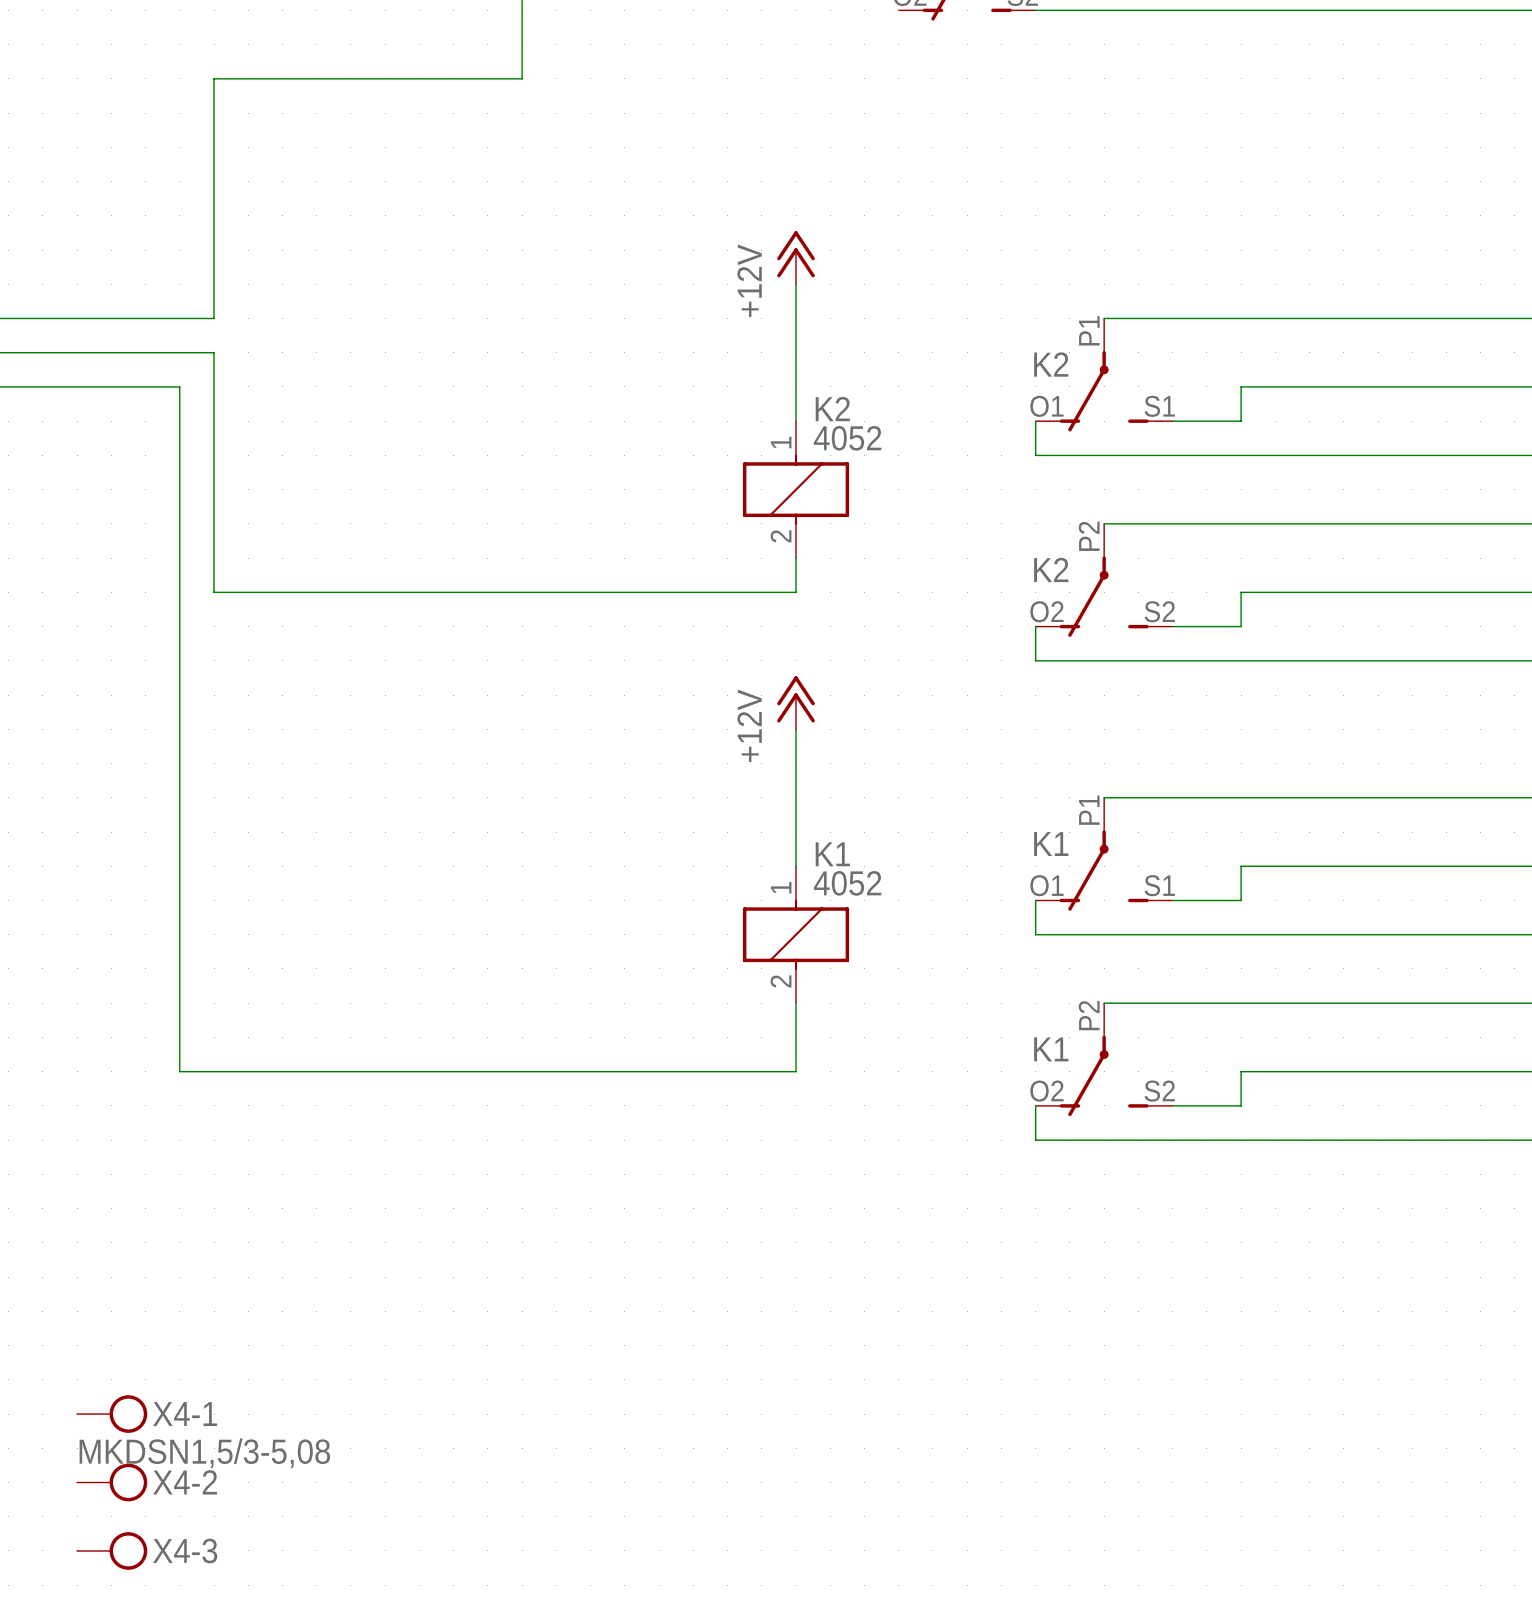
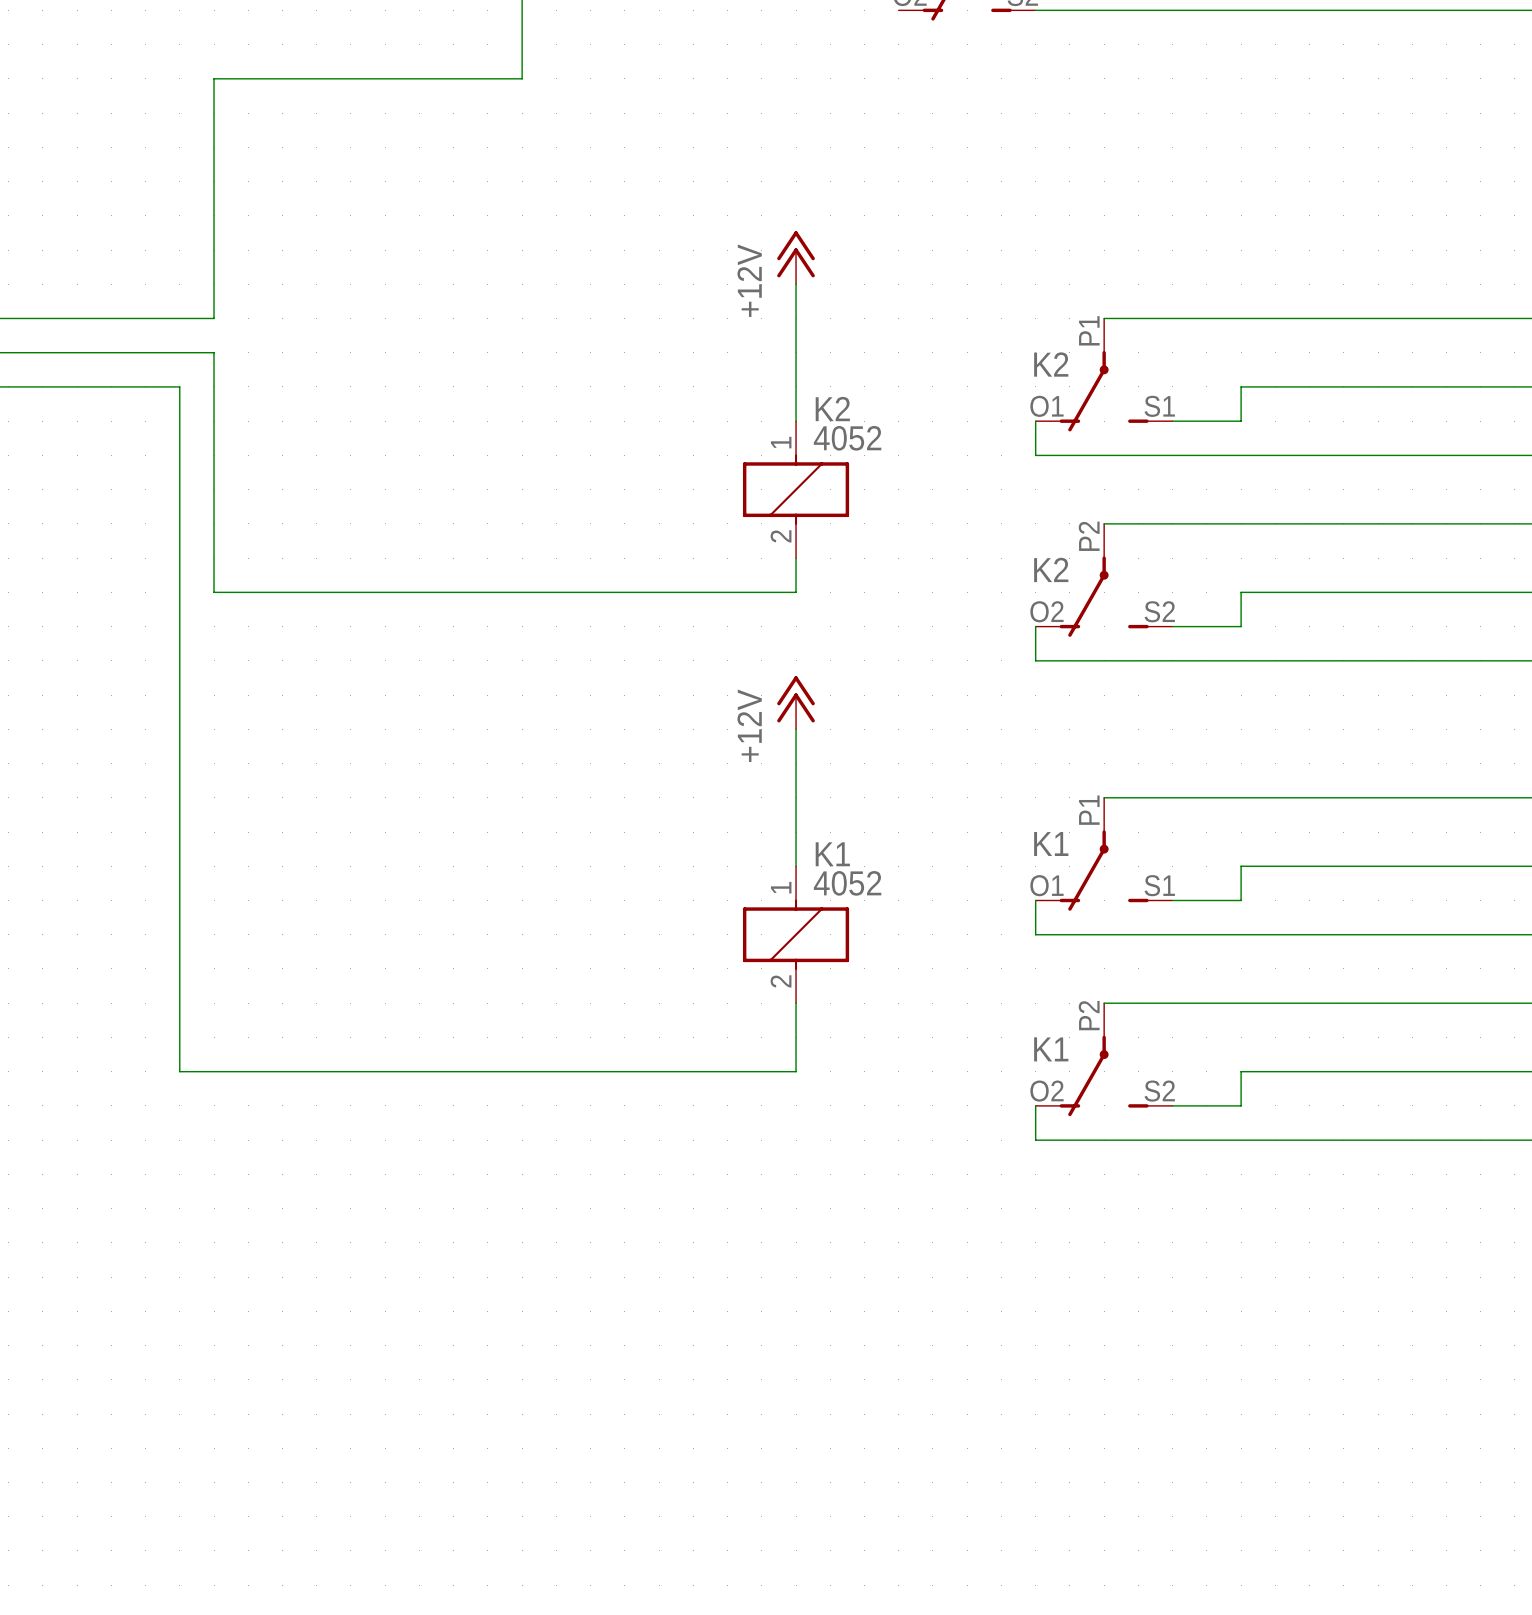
X4-1: MKDSN1,5/3-5,08 (112, 1414) -> none
X4-2: (112, 1482) -> none
X4-3: (112, 1550) -> none

